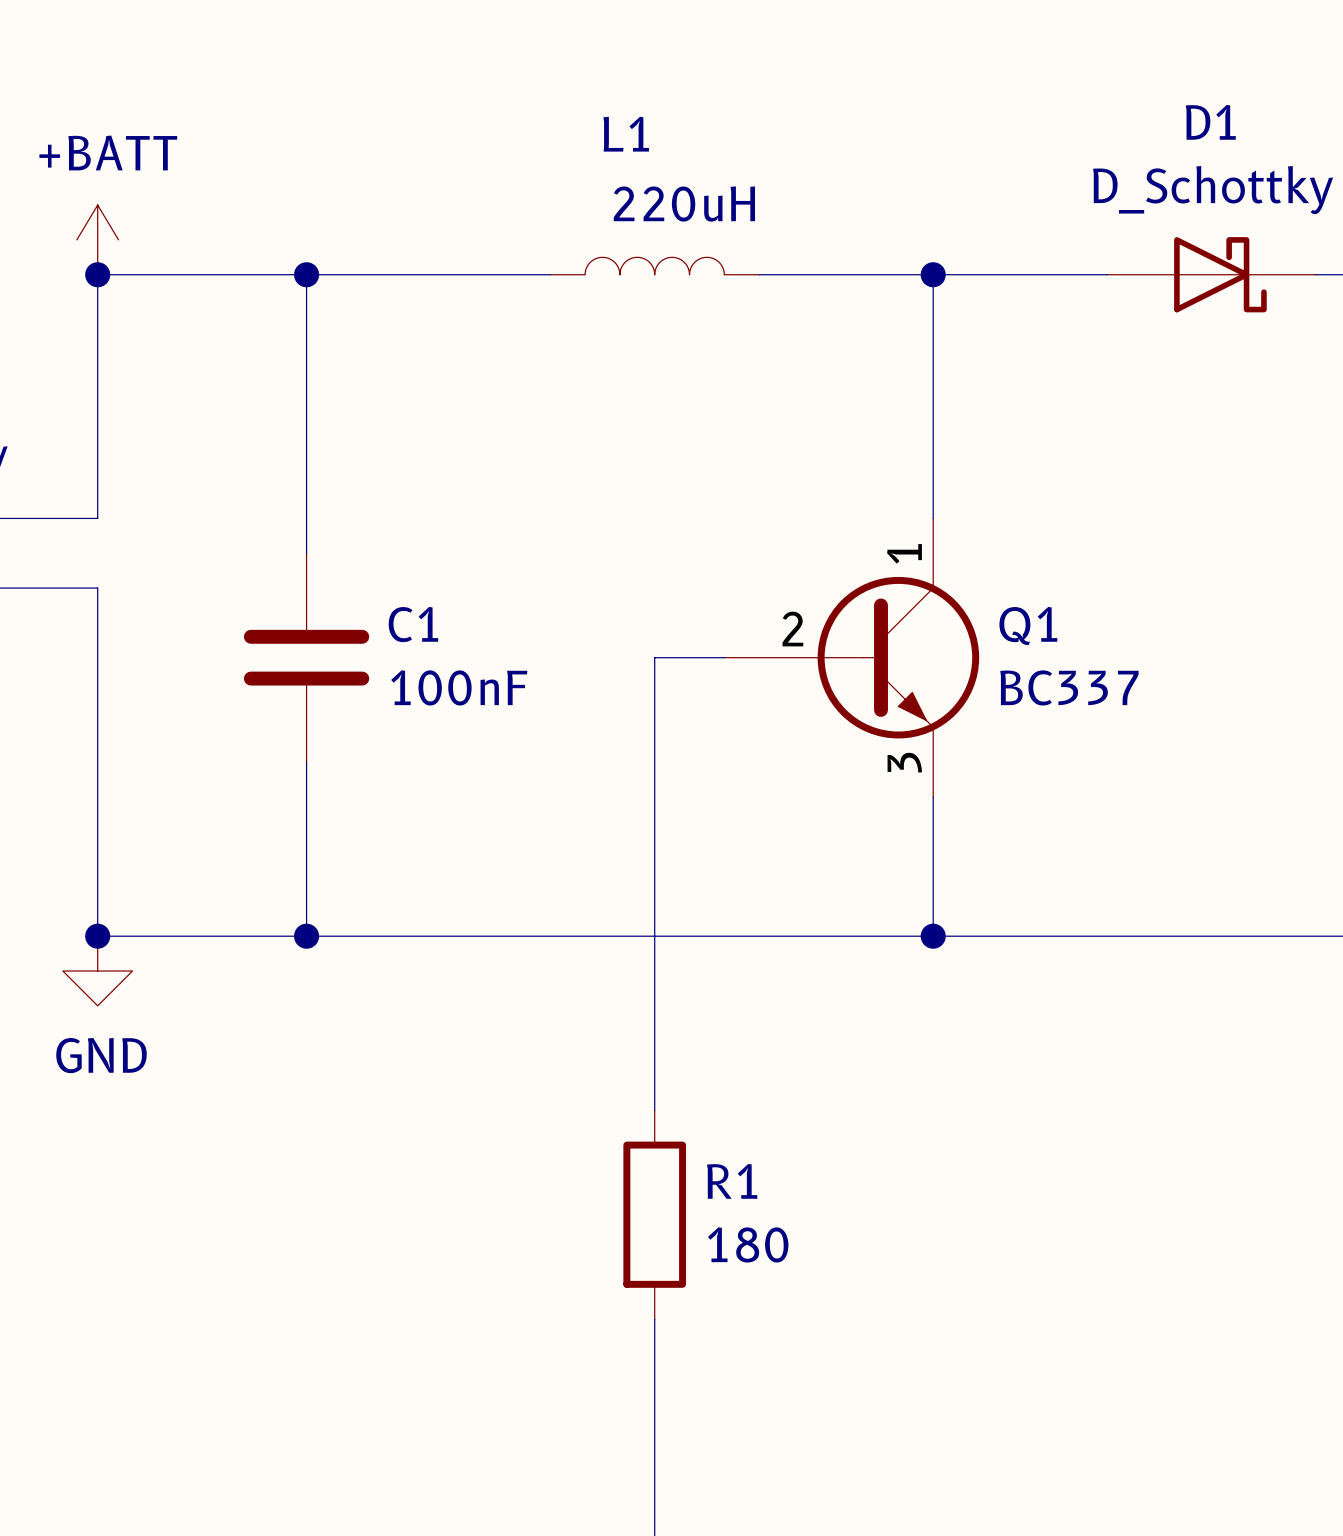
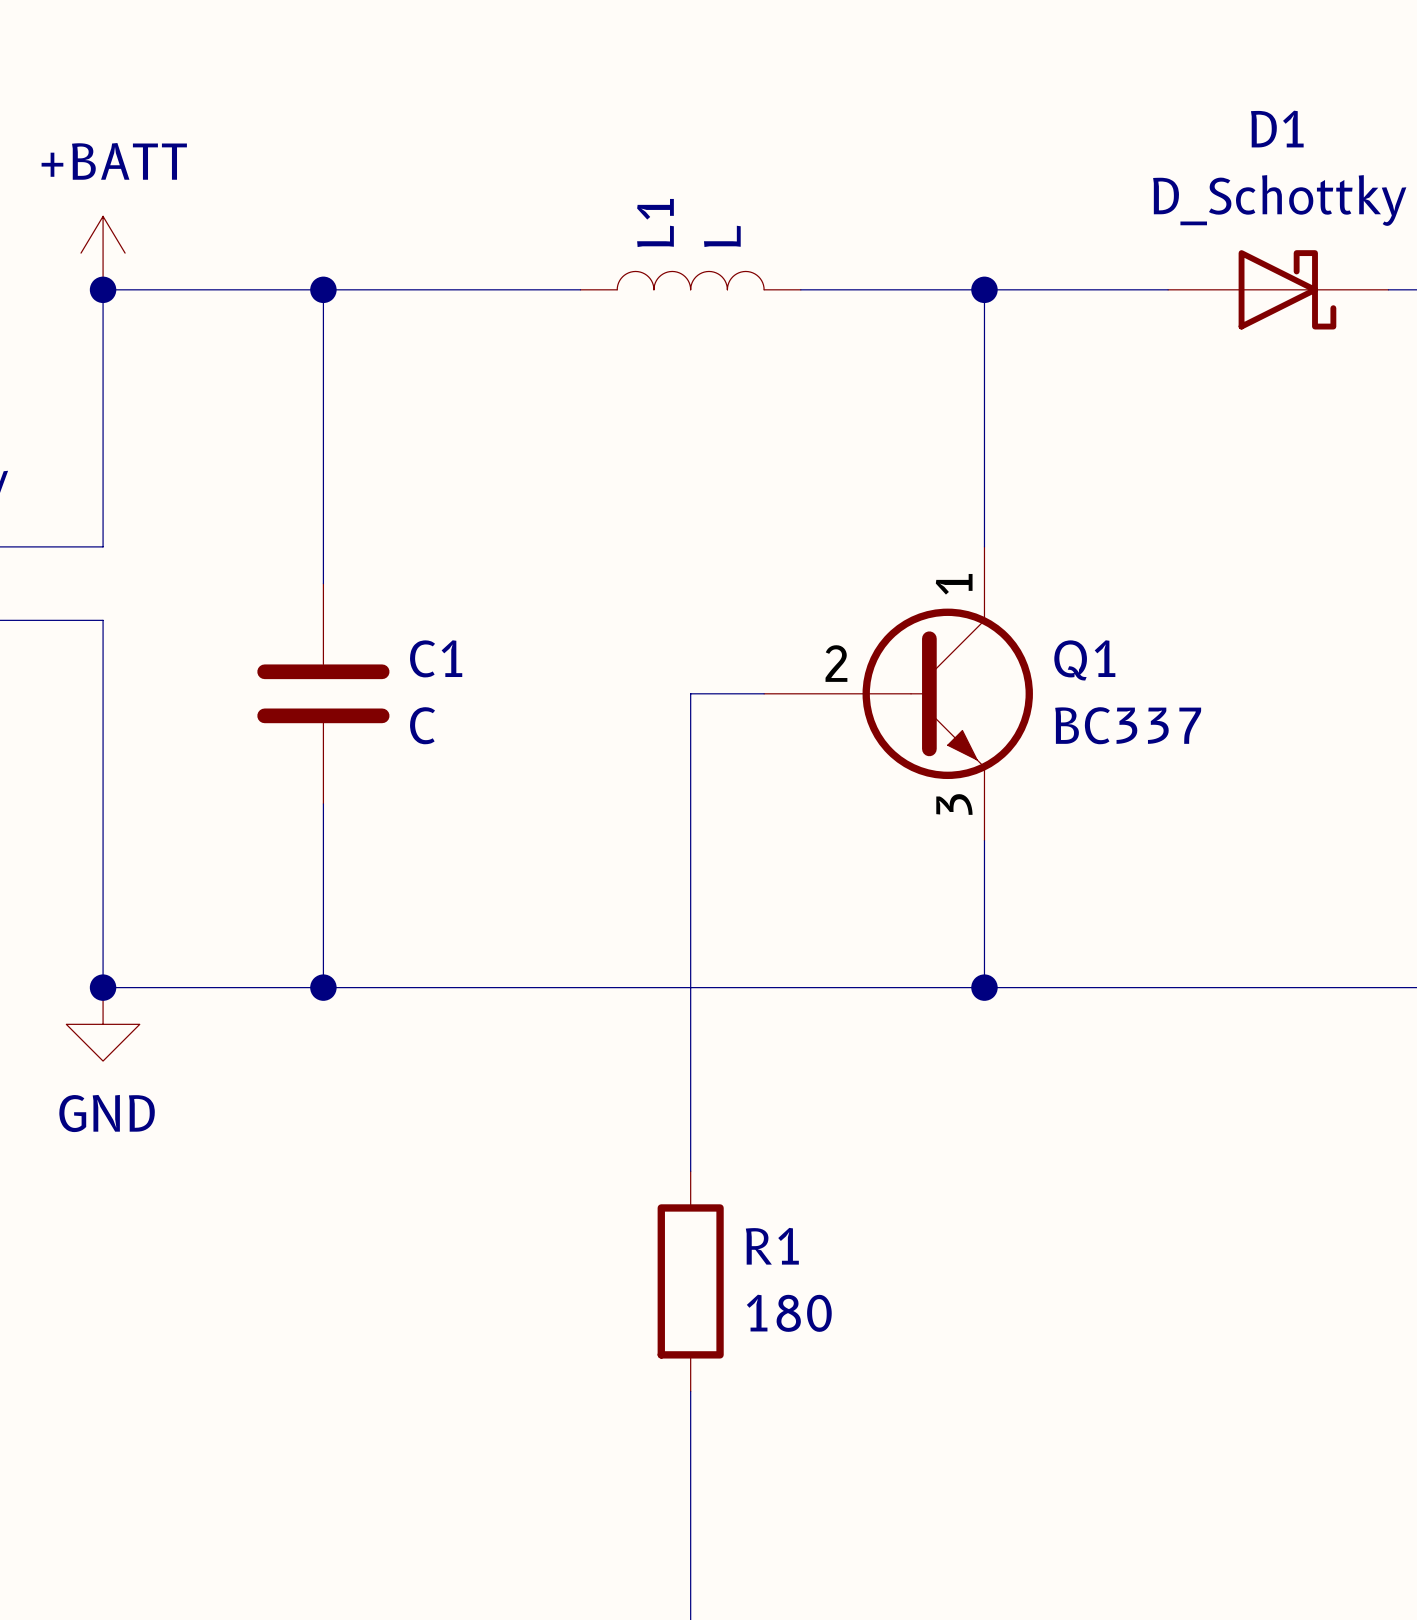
L1 name rotation: 0° (626, 134) -> 90° counterclockwise (655, 222)
L1 value: 220uH (684, 204) -> L (722, 236)
C1 value: 100nF (459, 687) -> C (422, 725)

